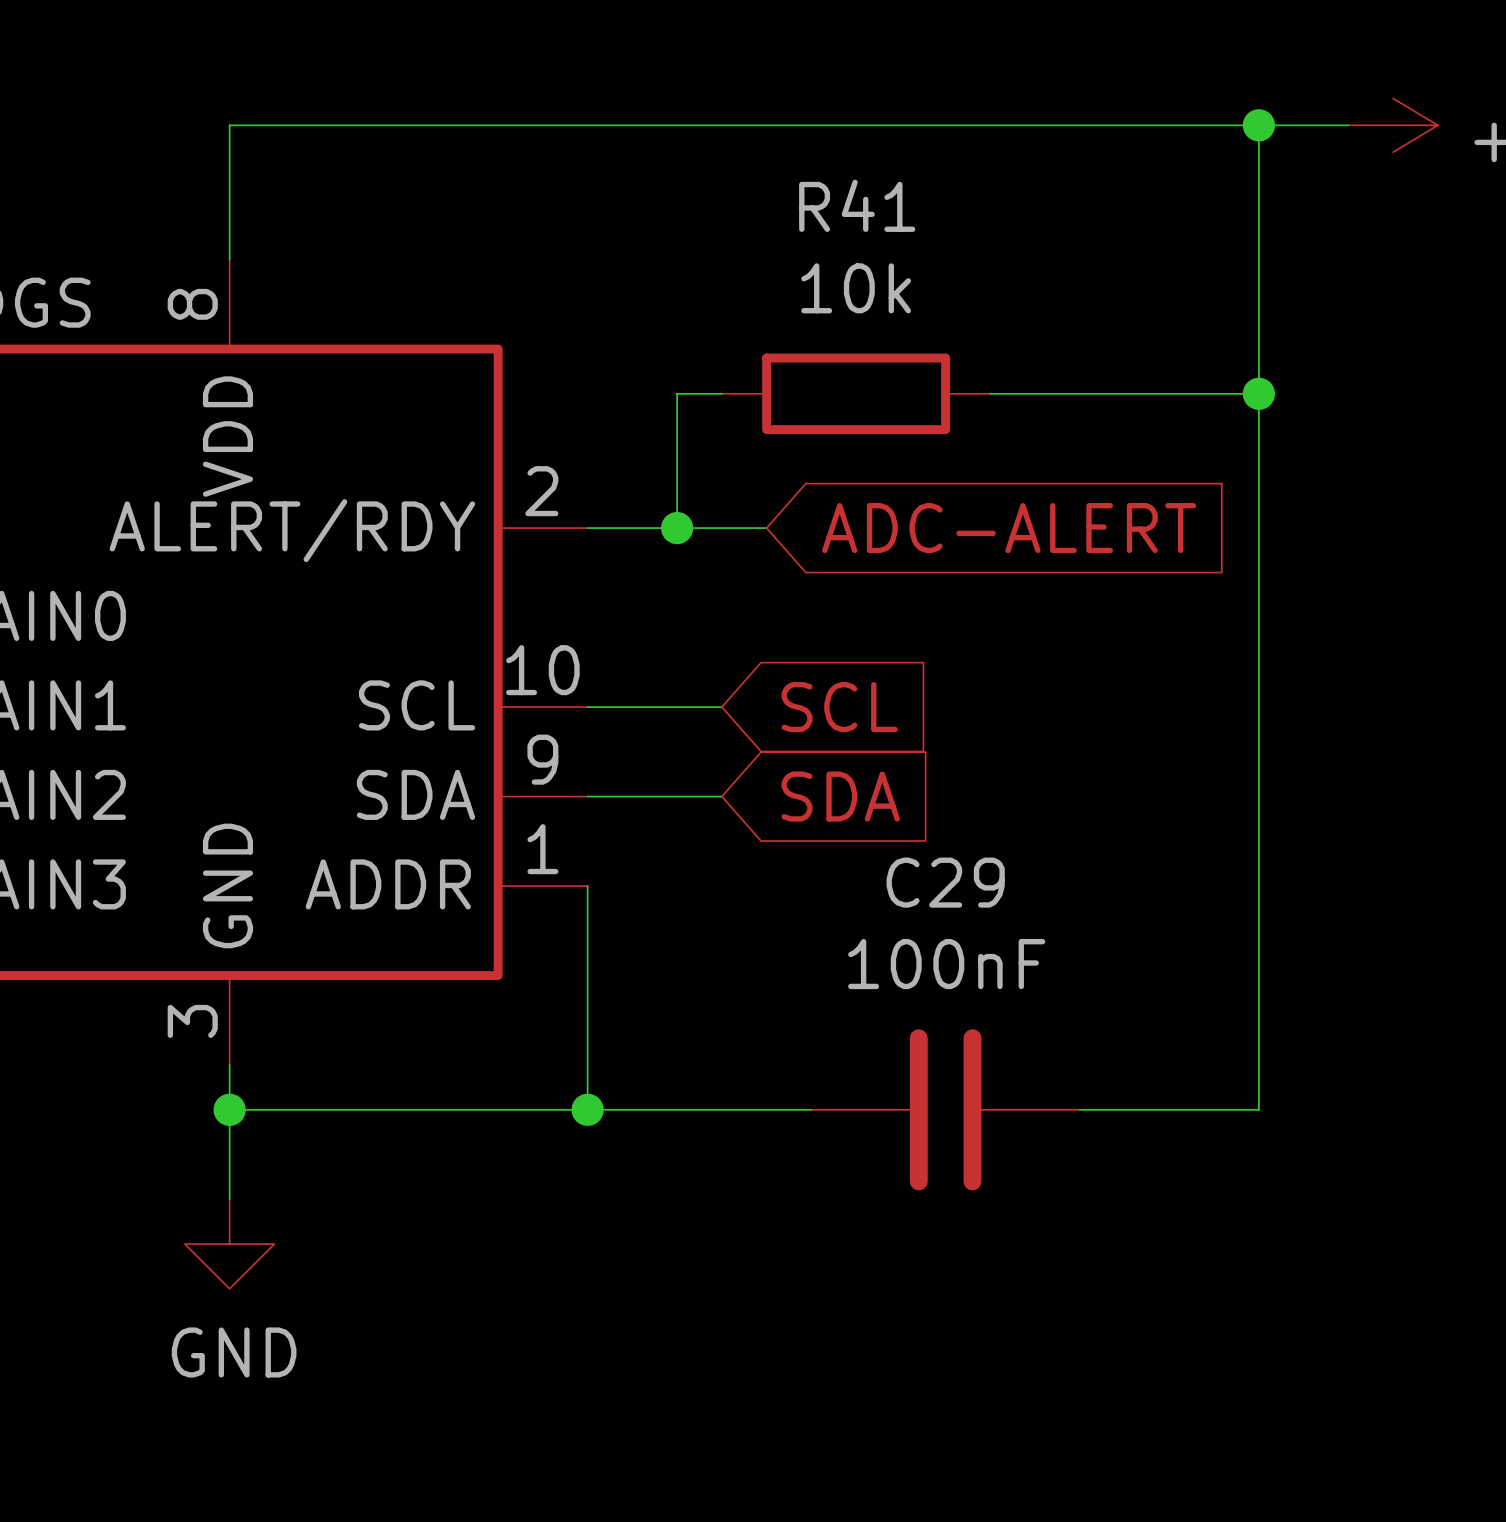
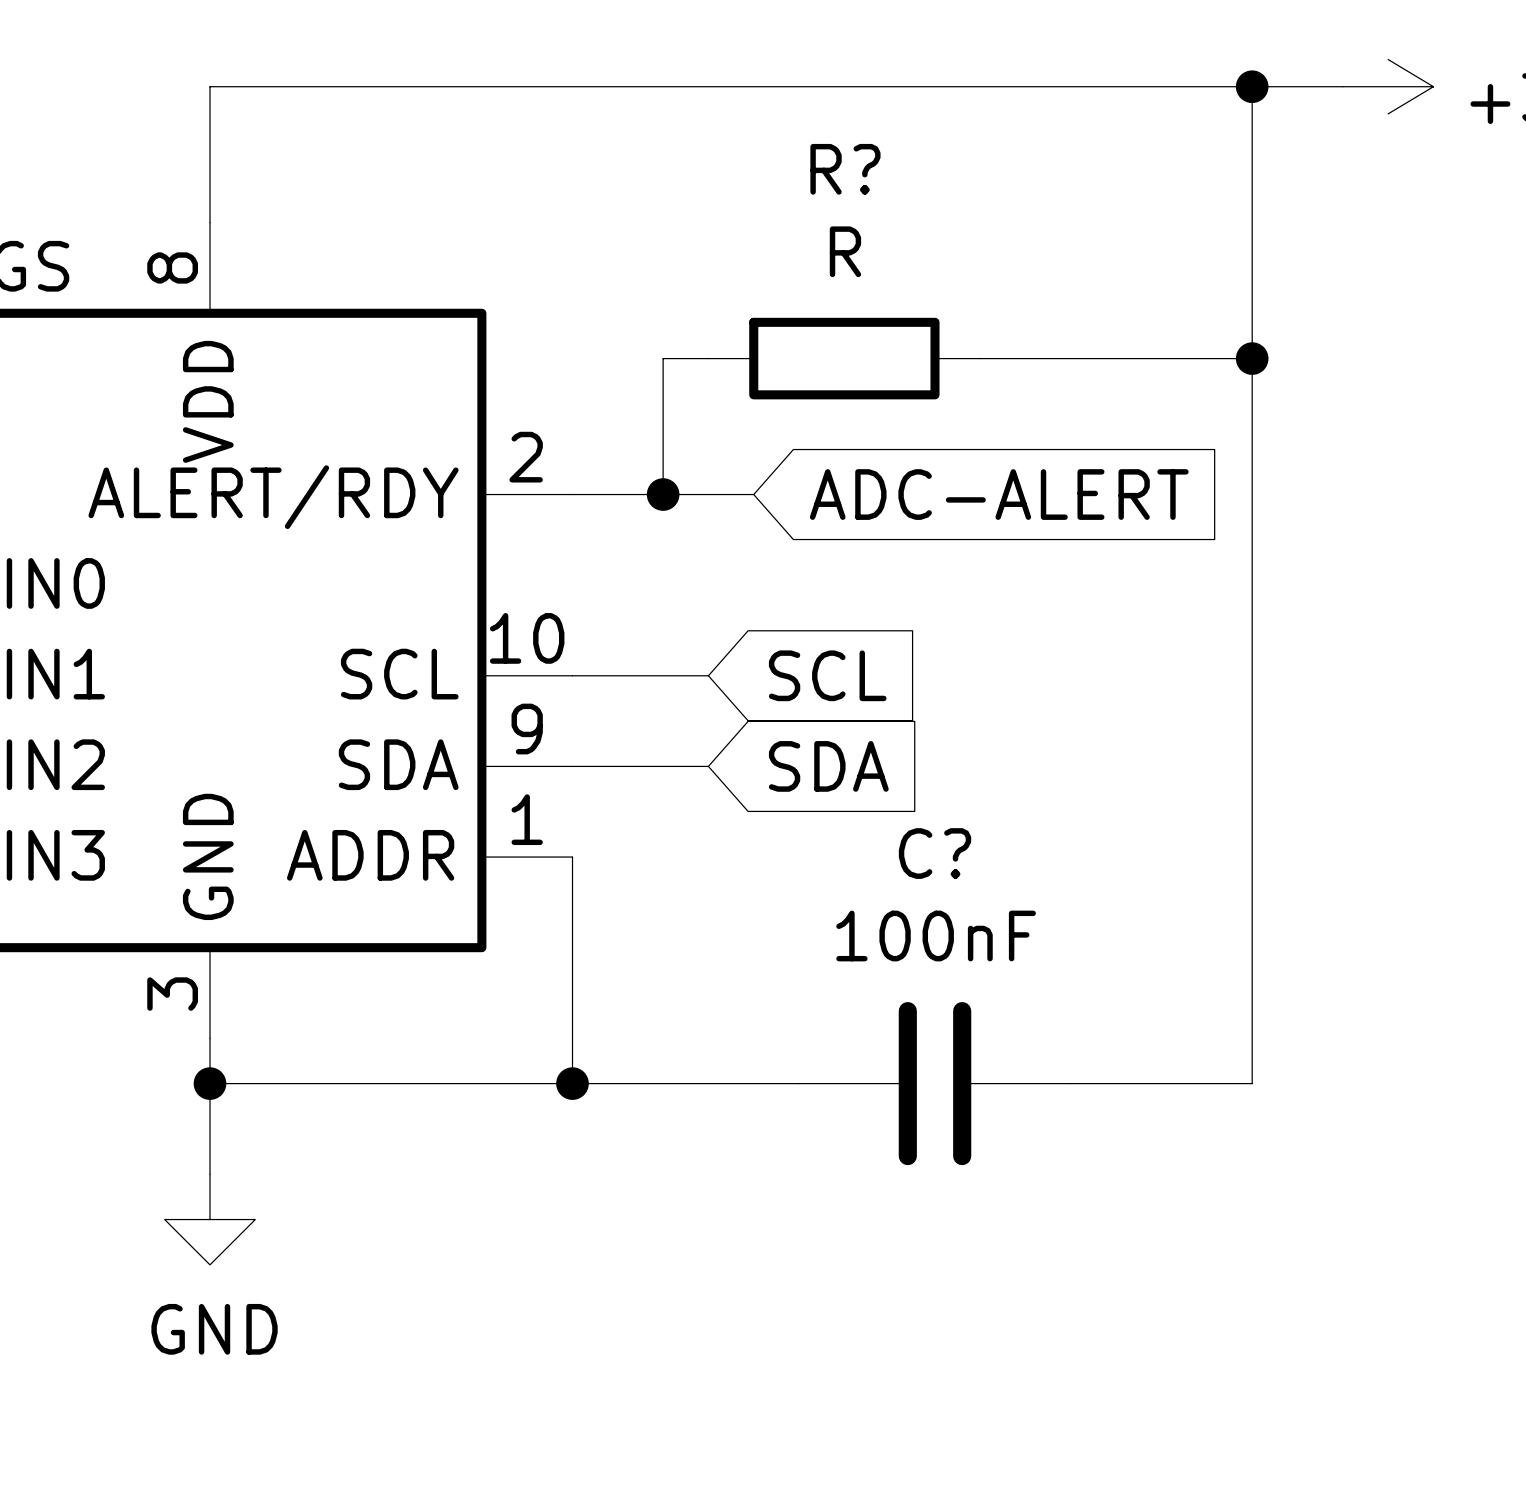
R41 name: R41 (857, 205) -> R? (845, 169)
R41 value: 10k (856, 288) -> R (845, 251)
C29 name: C29 (945, 882) -> C? (935, 853)

